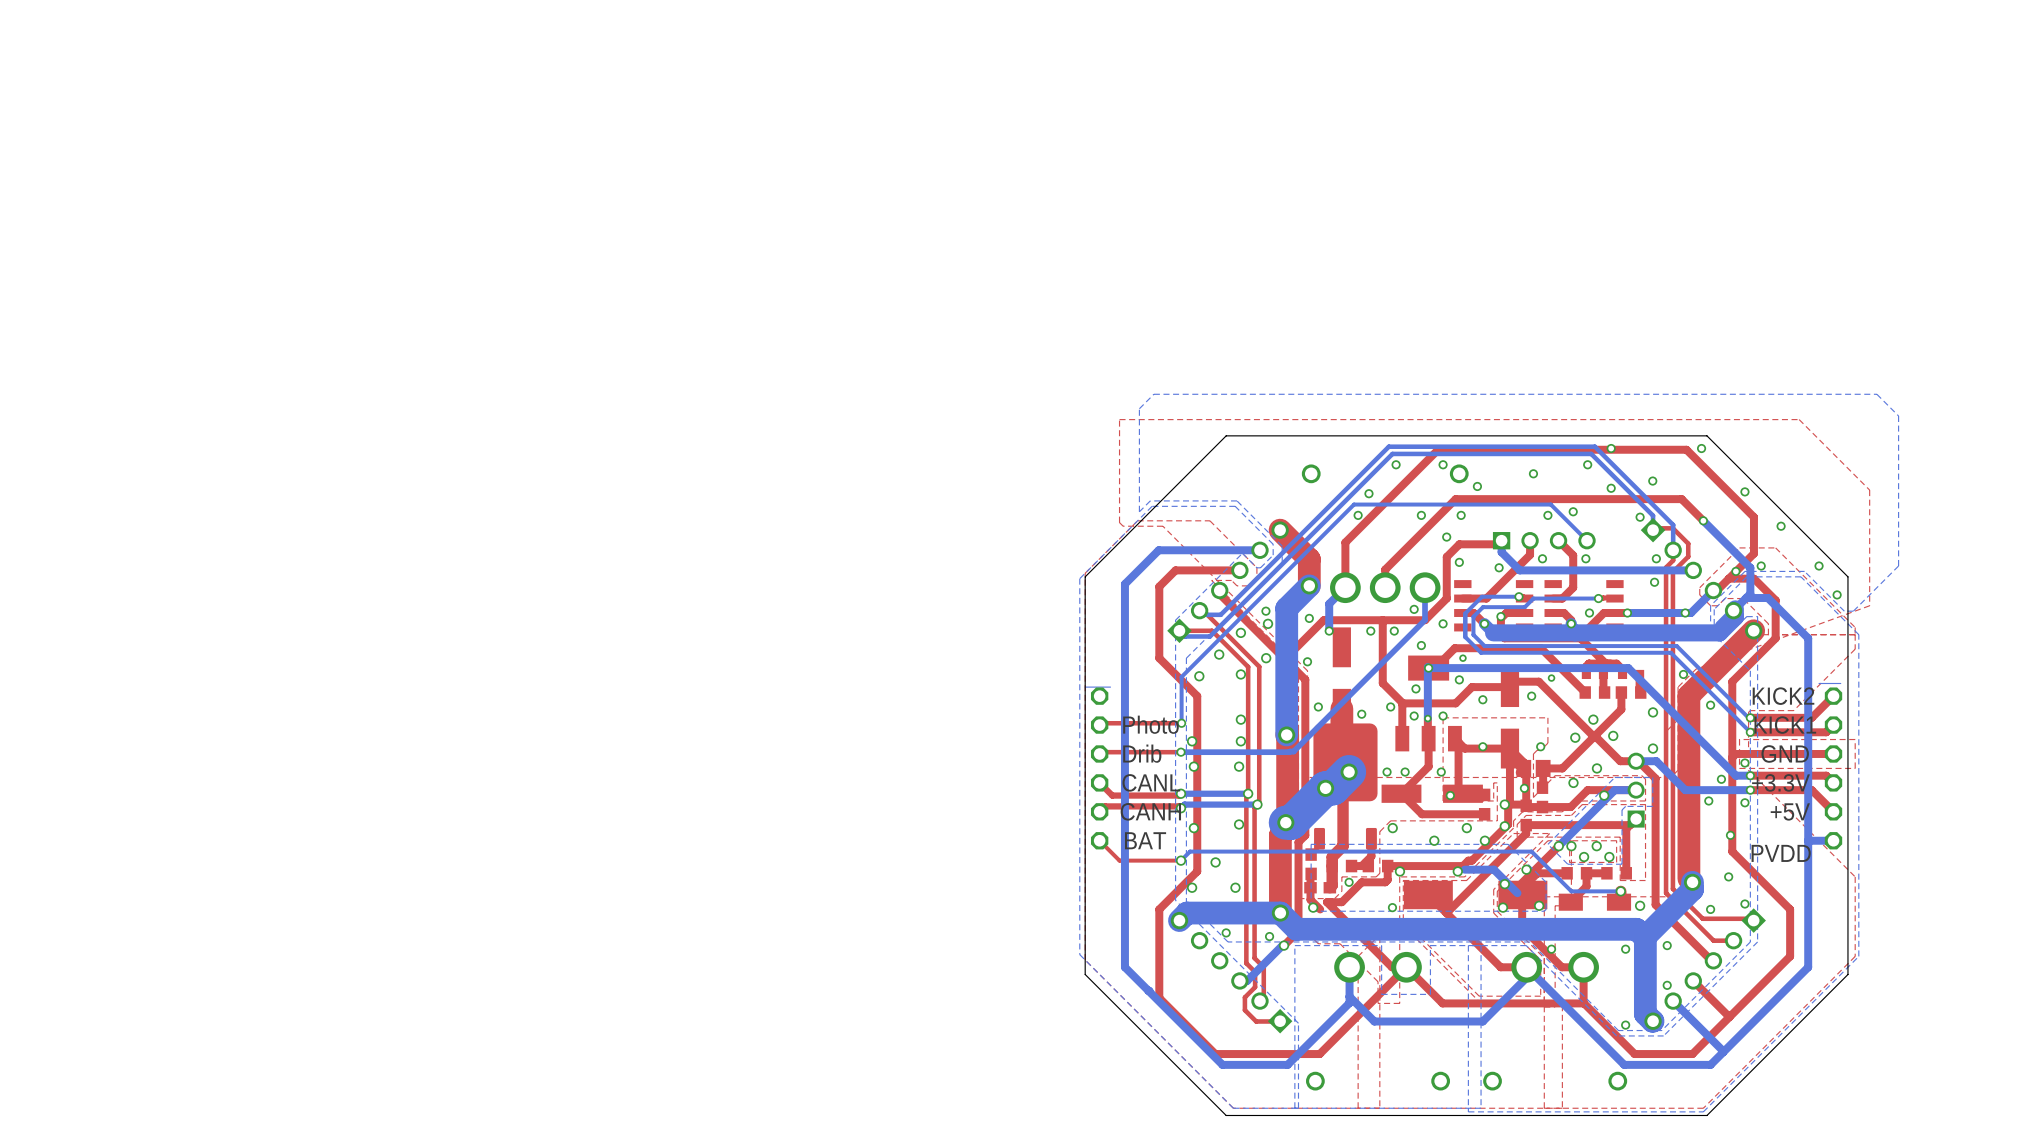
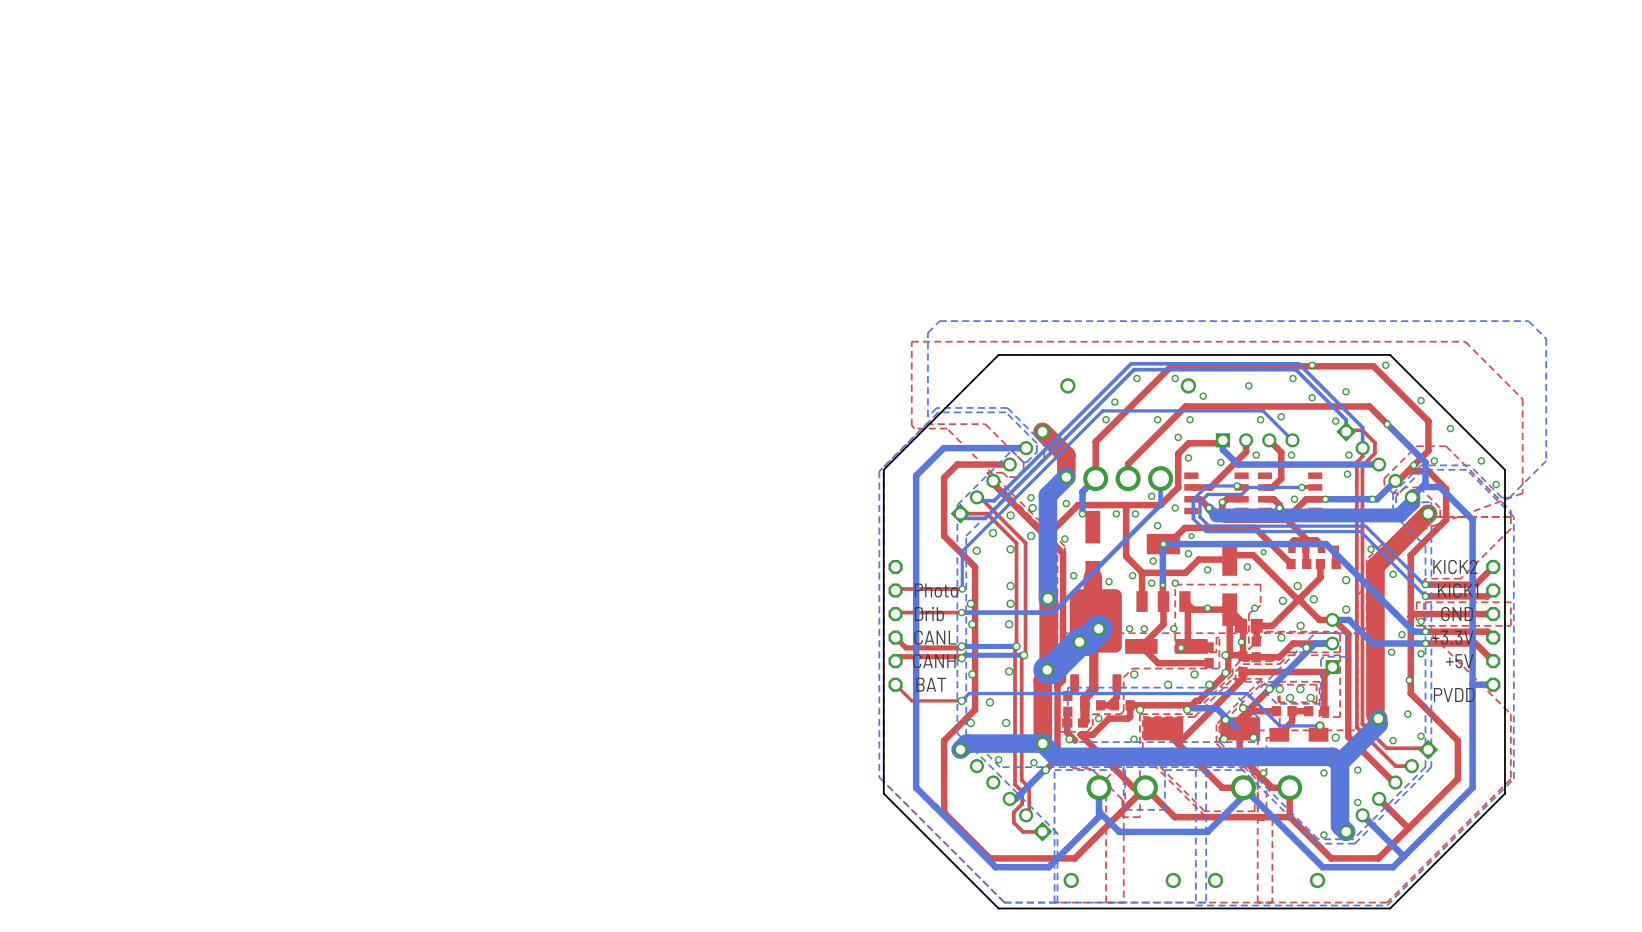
bottom track: (1840, 683) (1819, 683) -> none
bottom track: (1110, 687) (1085, 687) -> none

